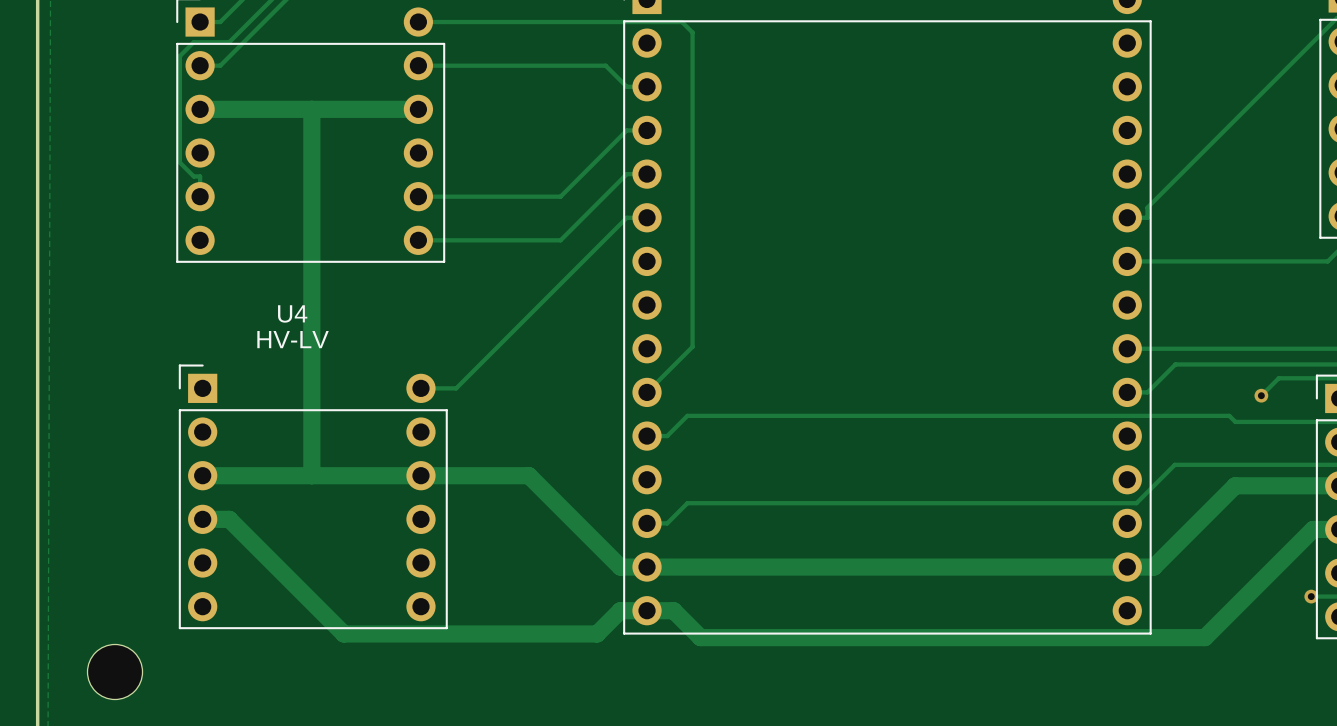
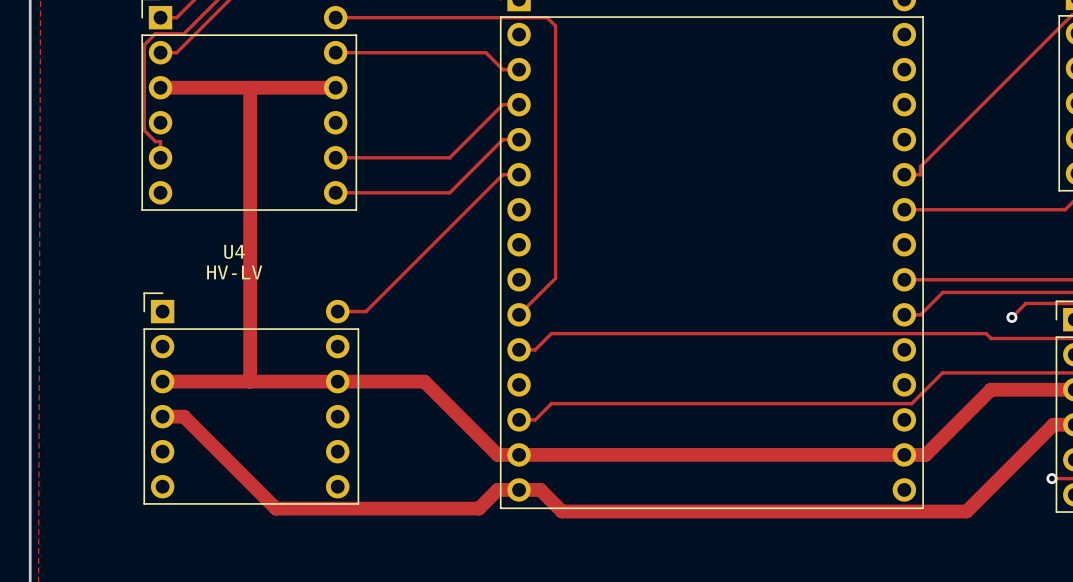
part: (115, 672) -> none

